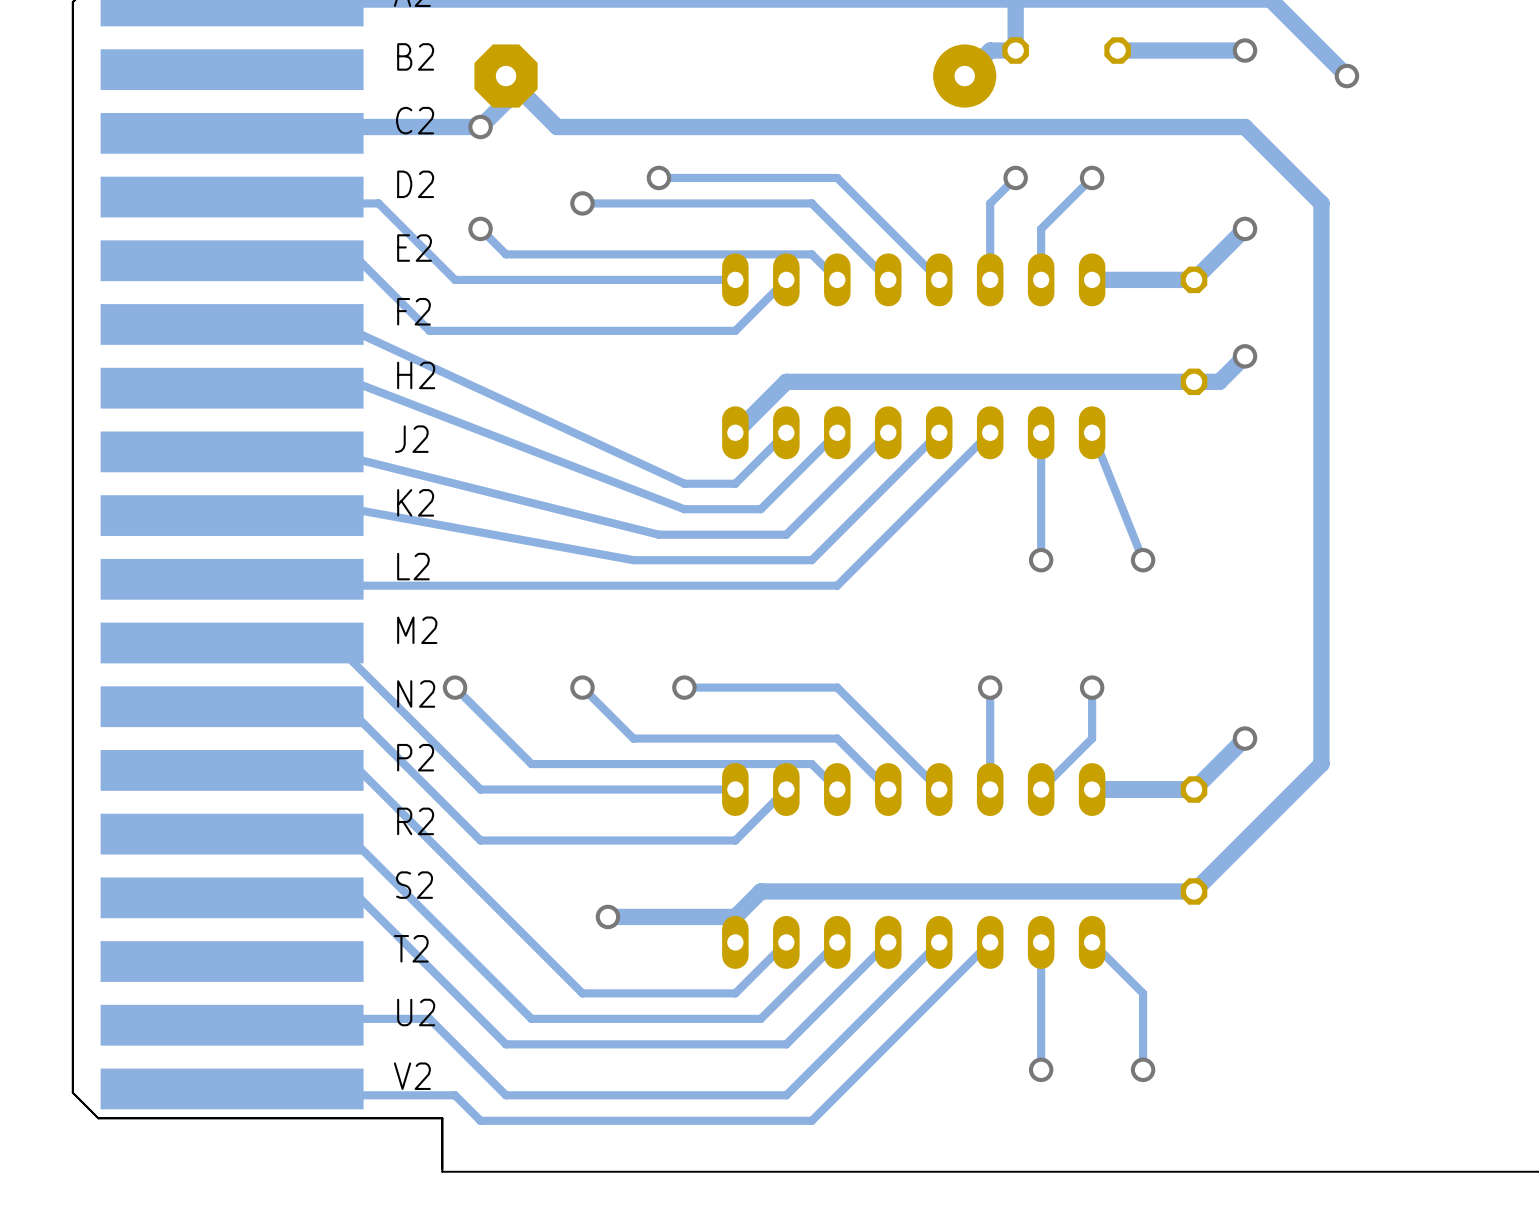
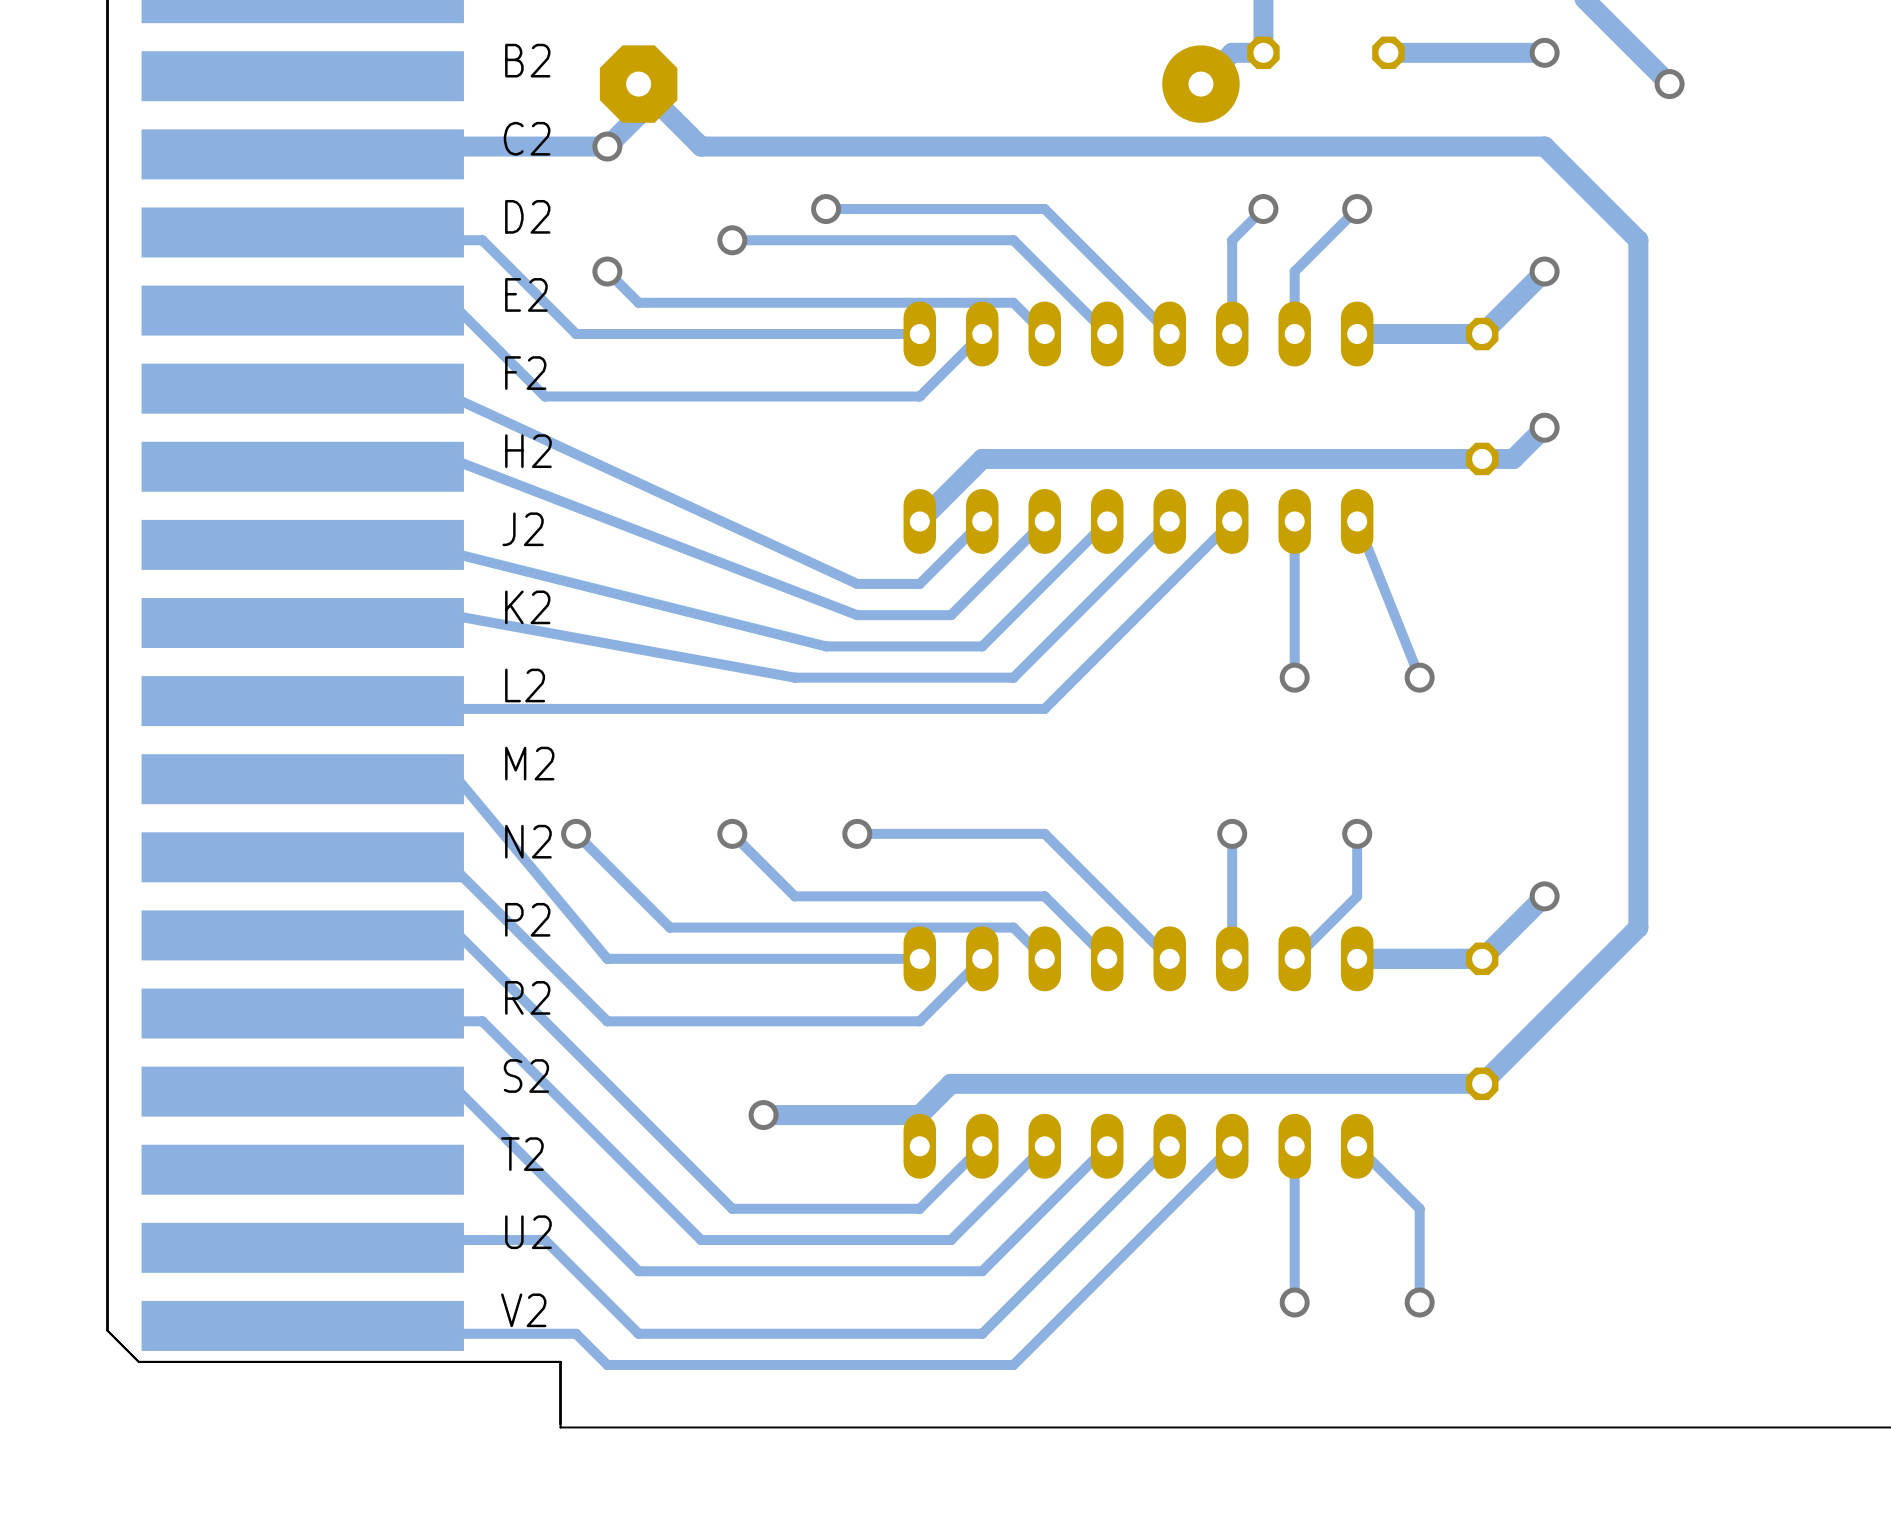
track: (327, 636) (480, 789) -> (419, 771) (451, 771) (607, 958)
track: (353, 840) (531, 1018) (556, 1018) -> (451, 1021) (482, 1021) (701, 1240)

